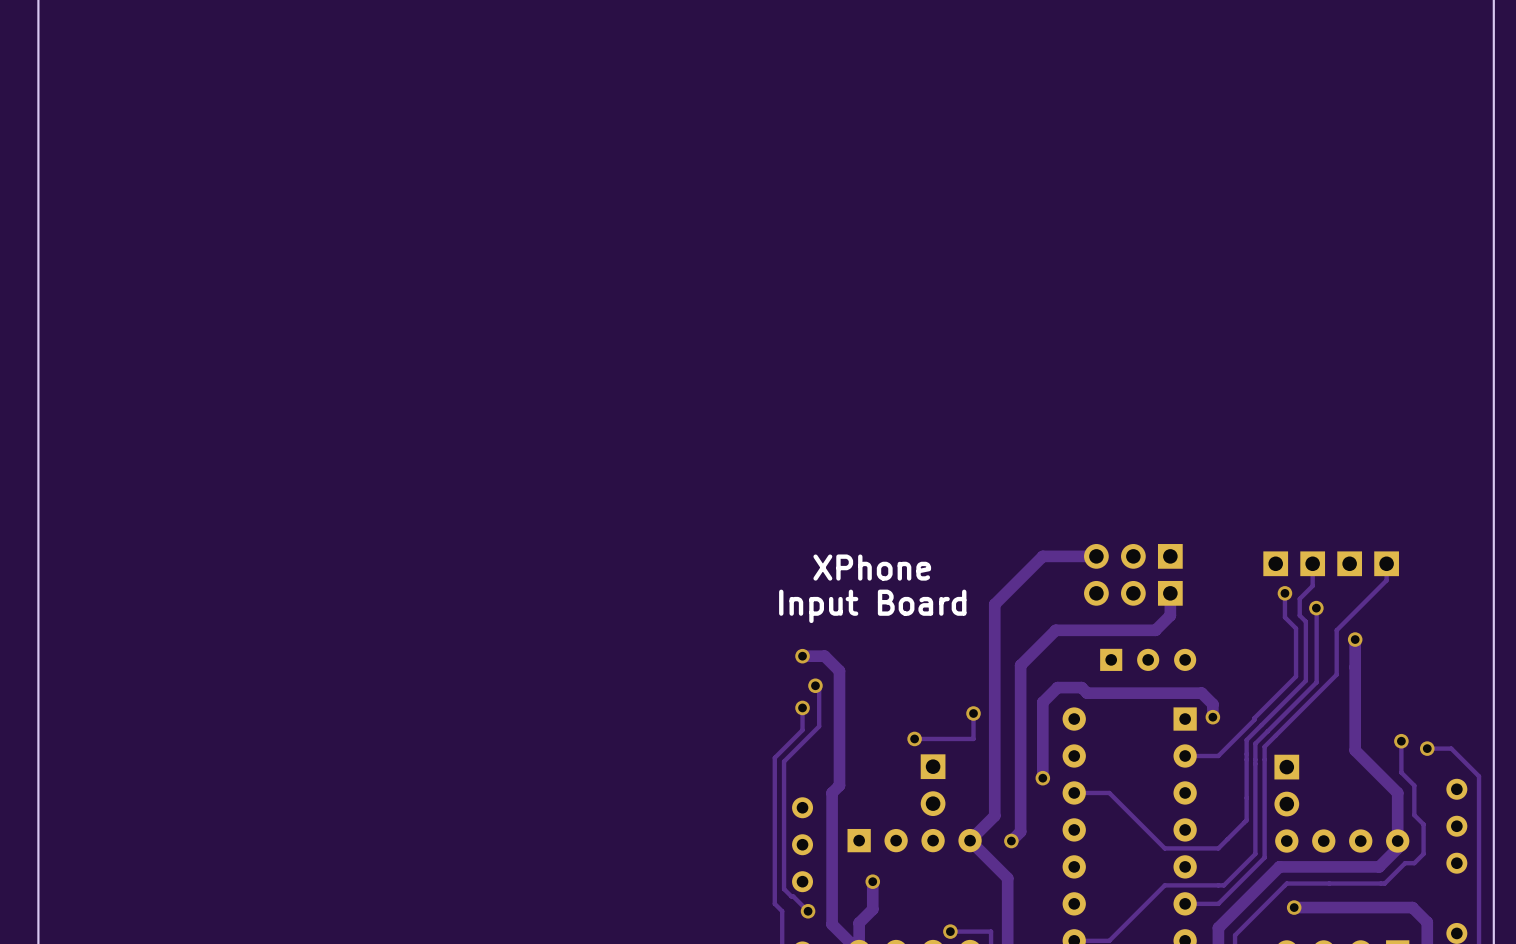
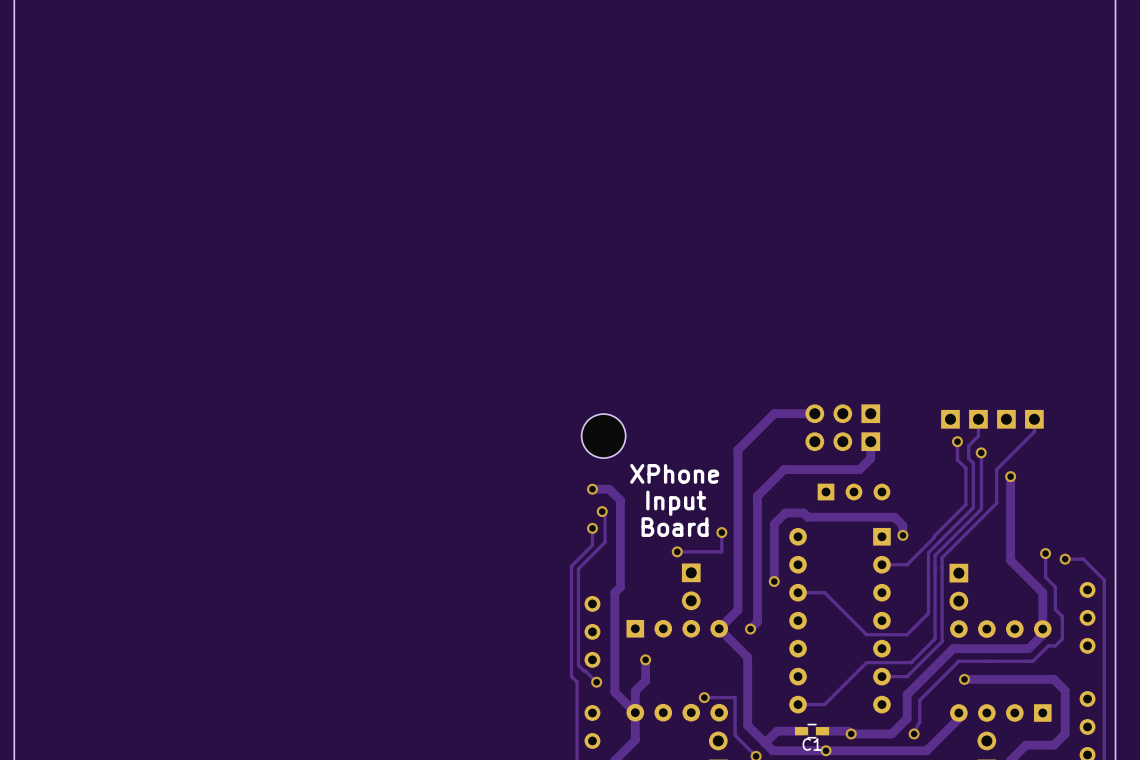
text position: XPhone (872, 567) -> XPhone (674, 473)
part: none -> (603, 436)
text: Input Board (872, 606) -> none
text: none -> Input (676, 503)
text: none -> Board (675, 527)

